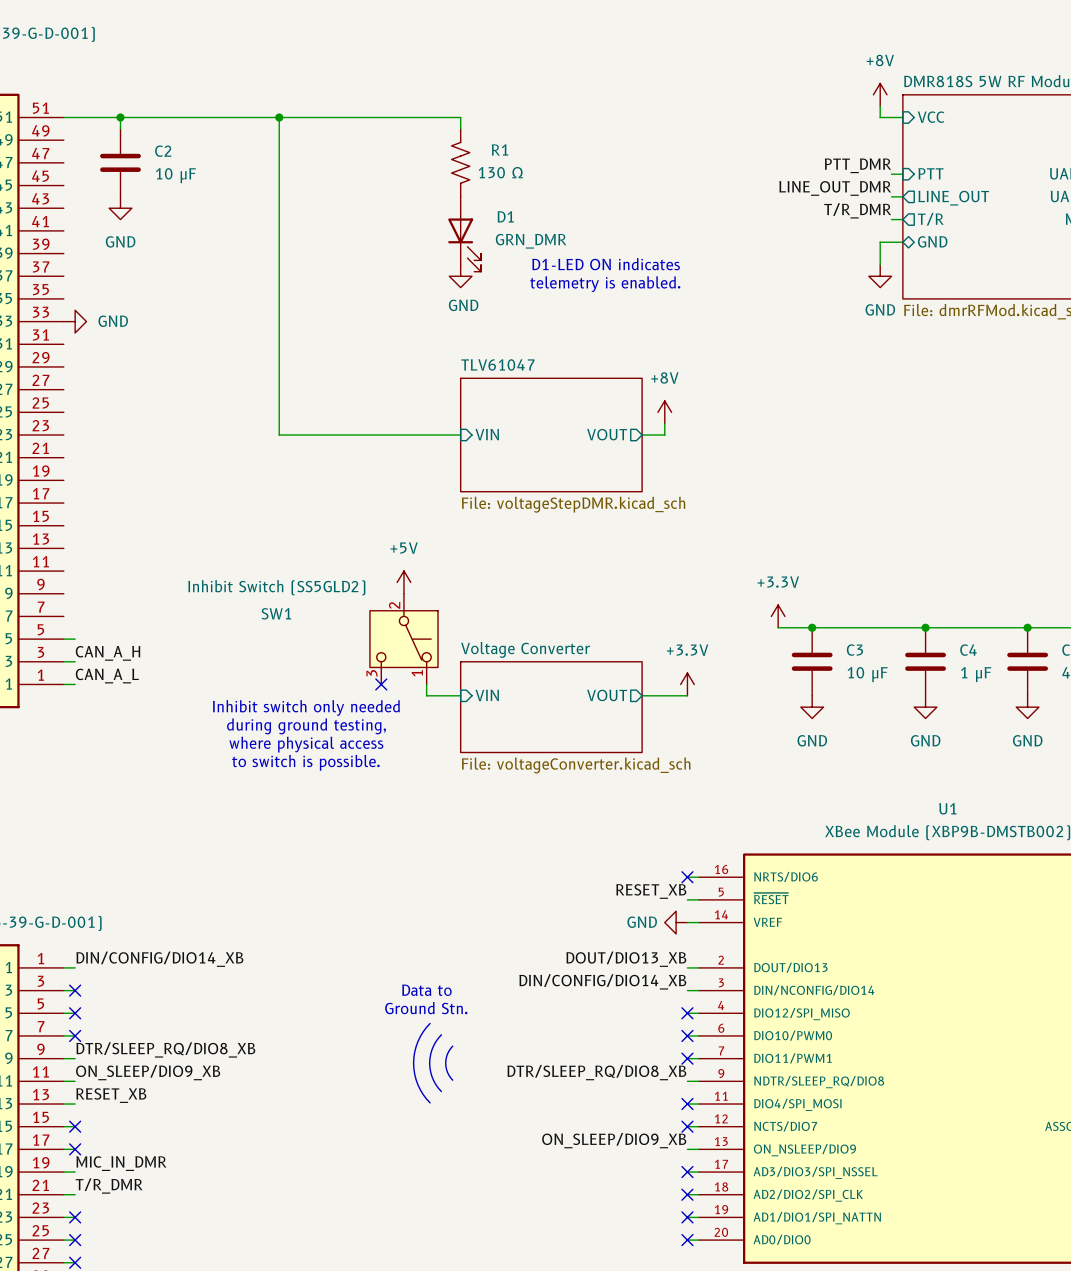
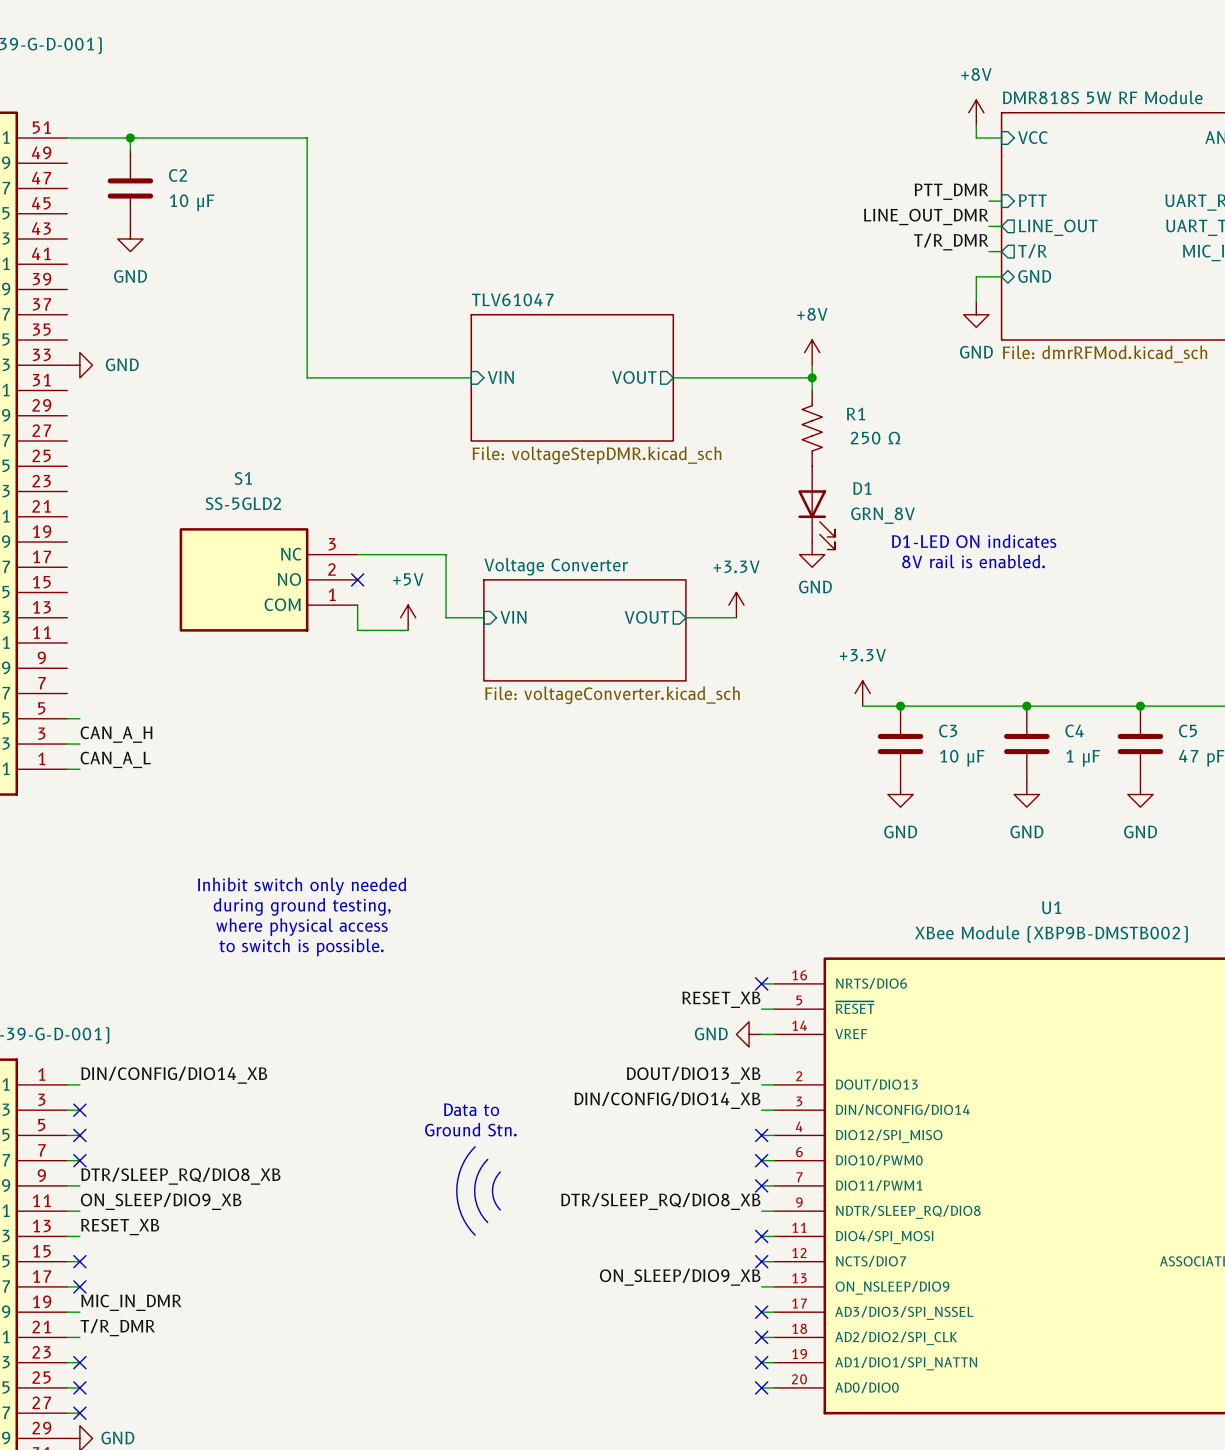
wire: (279, 117) (460, 117) (460, 128) -> none
junction: (279, 117) -> none
R1 position: (460, 162) -> (812, 428)
R1 value: 130 Ω (500, 172) -> 250 Ω (875, 438)
D1 position: (464, 234) -> (816, 507)
D1 value: GRN_DMR (531, 241) -> GRN_8V (883, 515)
text: D1-LED ON indicates (606, 264) -> none
power symbol: GND (460, 276) -> none
text: telemetry is enabled. (605, 284) -> none
wire: none -> (812, 365) (812, 390)
wire: (279, 332) (279, 435) (460, 435) -> (307, 377) (471, 377)
sheet pin: none -> VIN (500, 377)
sheet pin: none -> VOUT (634, 377)
wire: none -> (673, 377) (812, 377)
junction: none -> (812, 377)
power symbol position: +8V (664, 412) -> +8V (812, 352)
wire: (664, 423) (664, 435) (642, 435) -> none
sheet pin: VIN (487, 434) -> none
sheet pin: VOUT (607, 434) -> none
sheet TLV61047 position: (551, 435) -> (572, 377)
text: none -> D1-LED ON indicates (974, 541)
wire: none -> (357, 554) (446, 554) (446, 617) (483, 617)
power symbol: none -> GND (812, 554)
text: none -> 8V rail is enabled. (973, 561)
S1: none -> SS-5GLD2 (268, 579)
no-connect mark: none -> (357, 579)
wire: none -> (357, 605) (357, 630) (408, 630)
sheet pin: none -> VIN (513, 617)
sheet pin: none -> VOUT (646, 617)
power symbol position: +5V (403, 582) -> +5V (408, 617)
SW1: Inhibit Switch (SS5GLD2) (403, 639) -> none
no-connect mark: (381, 684) -> none
wire: (426, 684) (426, 695) (460, 695) -> none
power symbol position: +3.3V (687, 684) -> +3.3V (736, 605)
sheet pin: VIN (487, 695) -> none
sheet pin: VOUT (607, 695) -> none
wire: (642, 695) (687, 695) -> (685, 617) (736, 617)
sheet Voltage Converter position: (551, 707) -> (584, 630)
text position: Inhibit switch only needed (306, 708) -> Inhibit switch only needed (302, 886)
text position: during ground testing, (306, 726) -> during ground testing, (302, 906)
text position: where physical access (306, 744) -> where physical access (302, 927)
text position: to switch is possible. (305, 762) -> to switch is possible. (301, 947)

